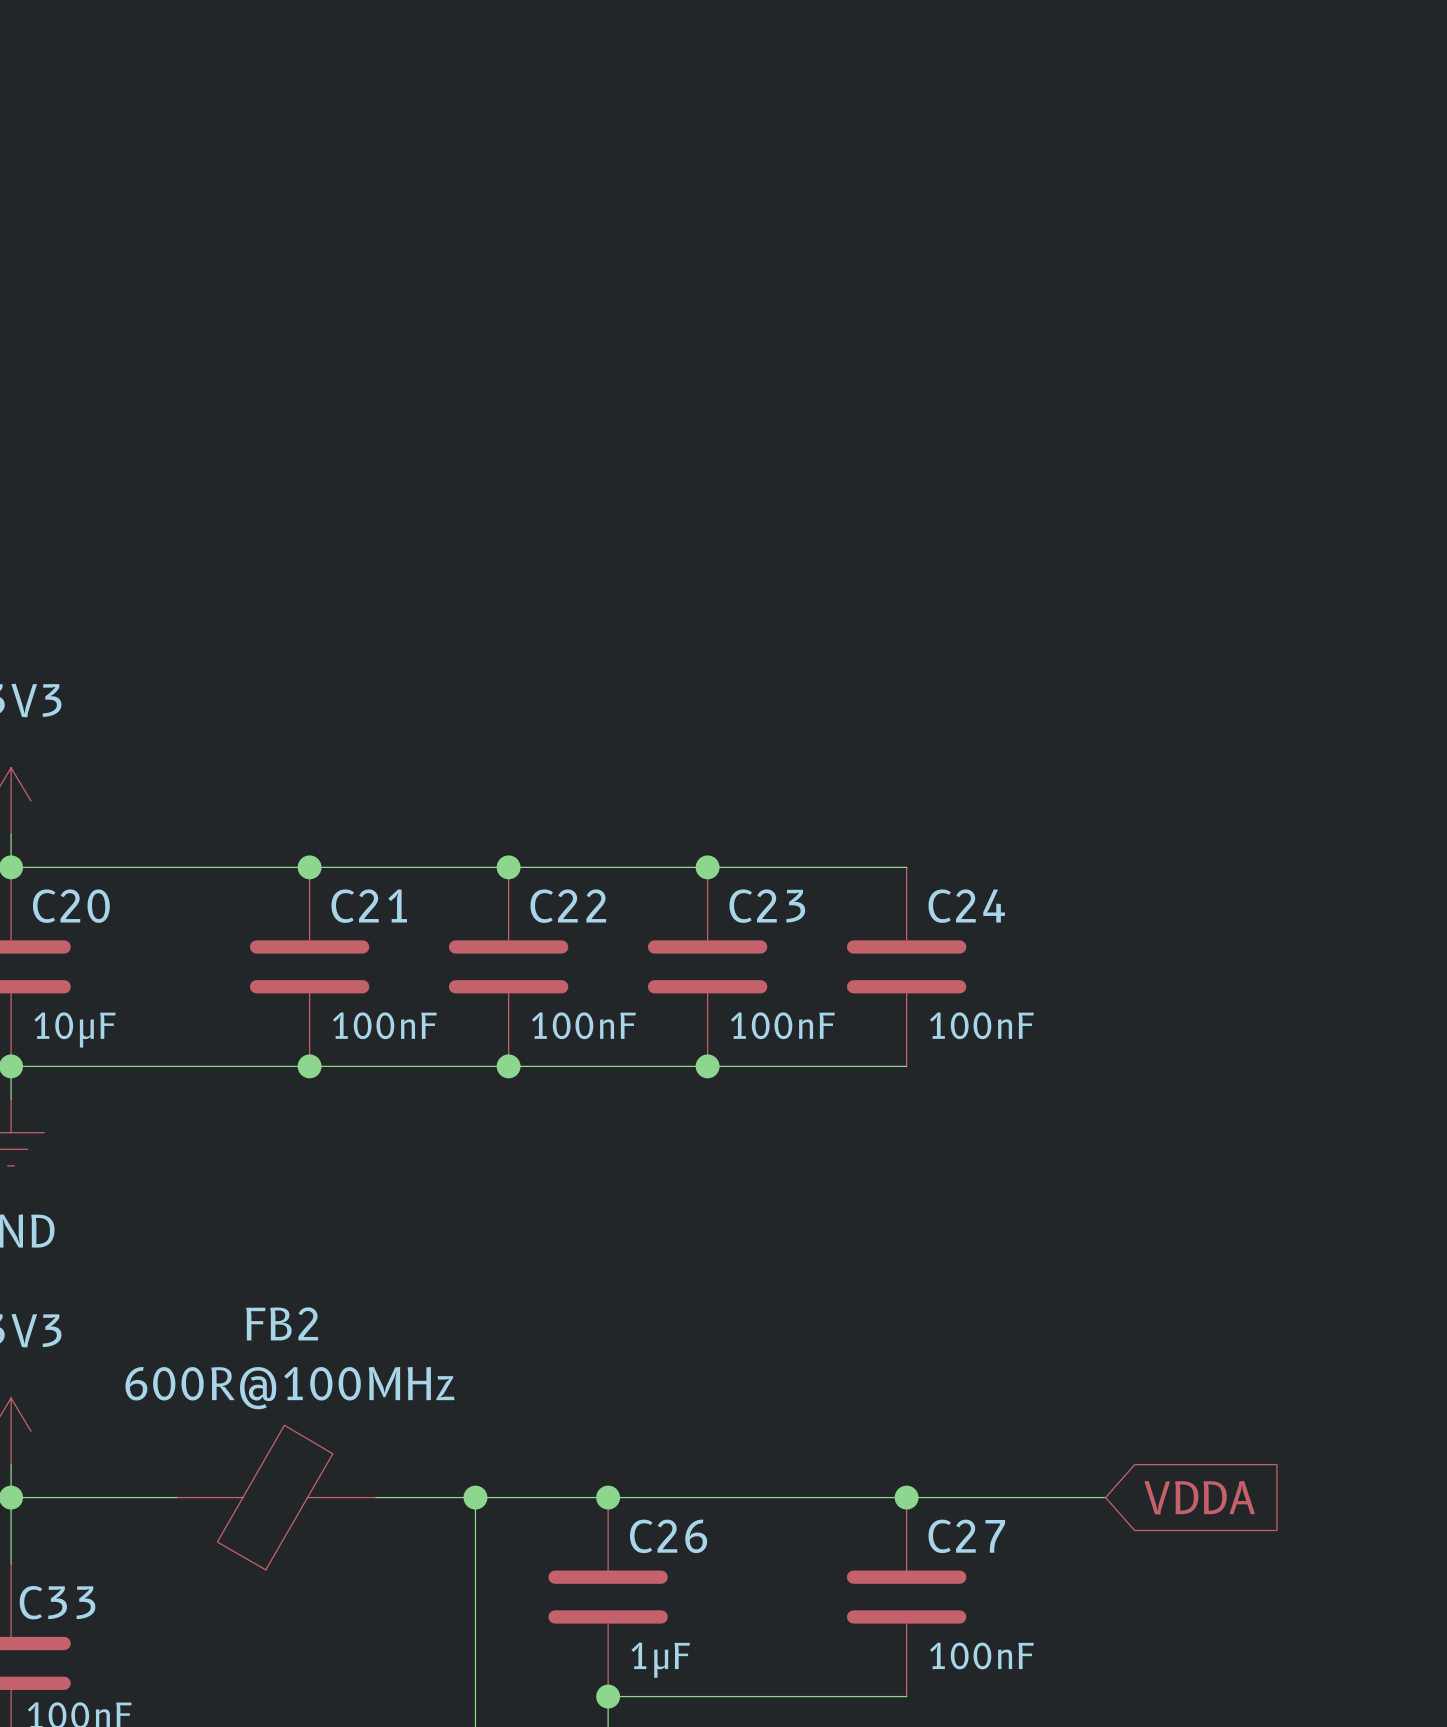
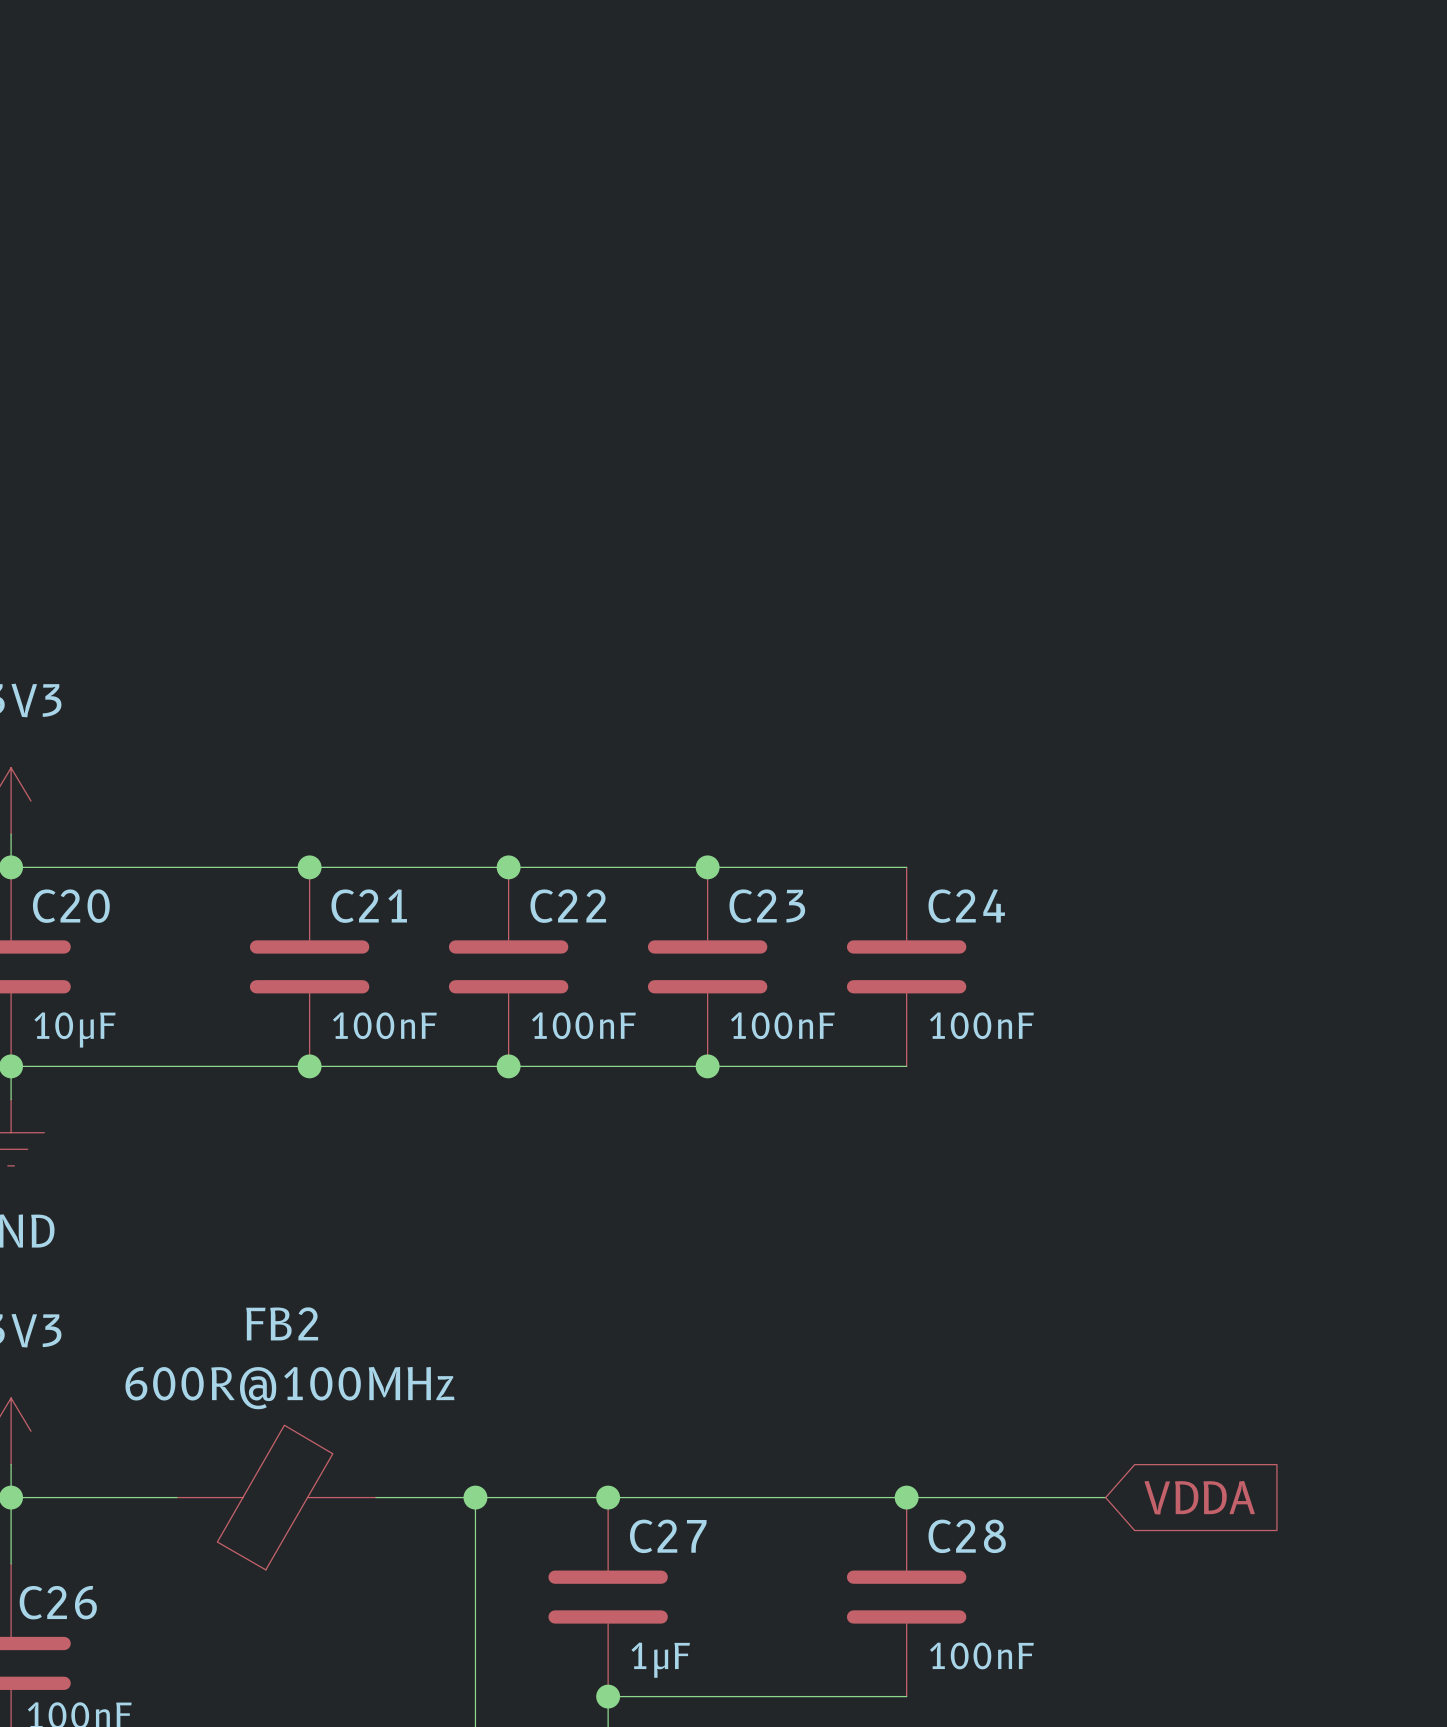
C26 name: C26 (668, 1536) -> C27 (668, 1536)
C27 name: C27 (966, 1536) -> C28 (967, 1536)
C33 name: C33 (57, 1602) -> C26 (58, 1602)

